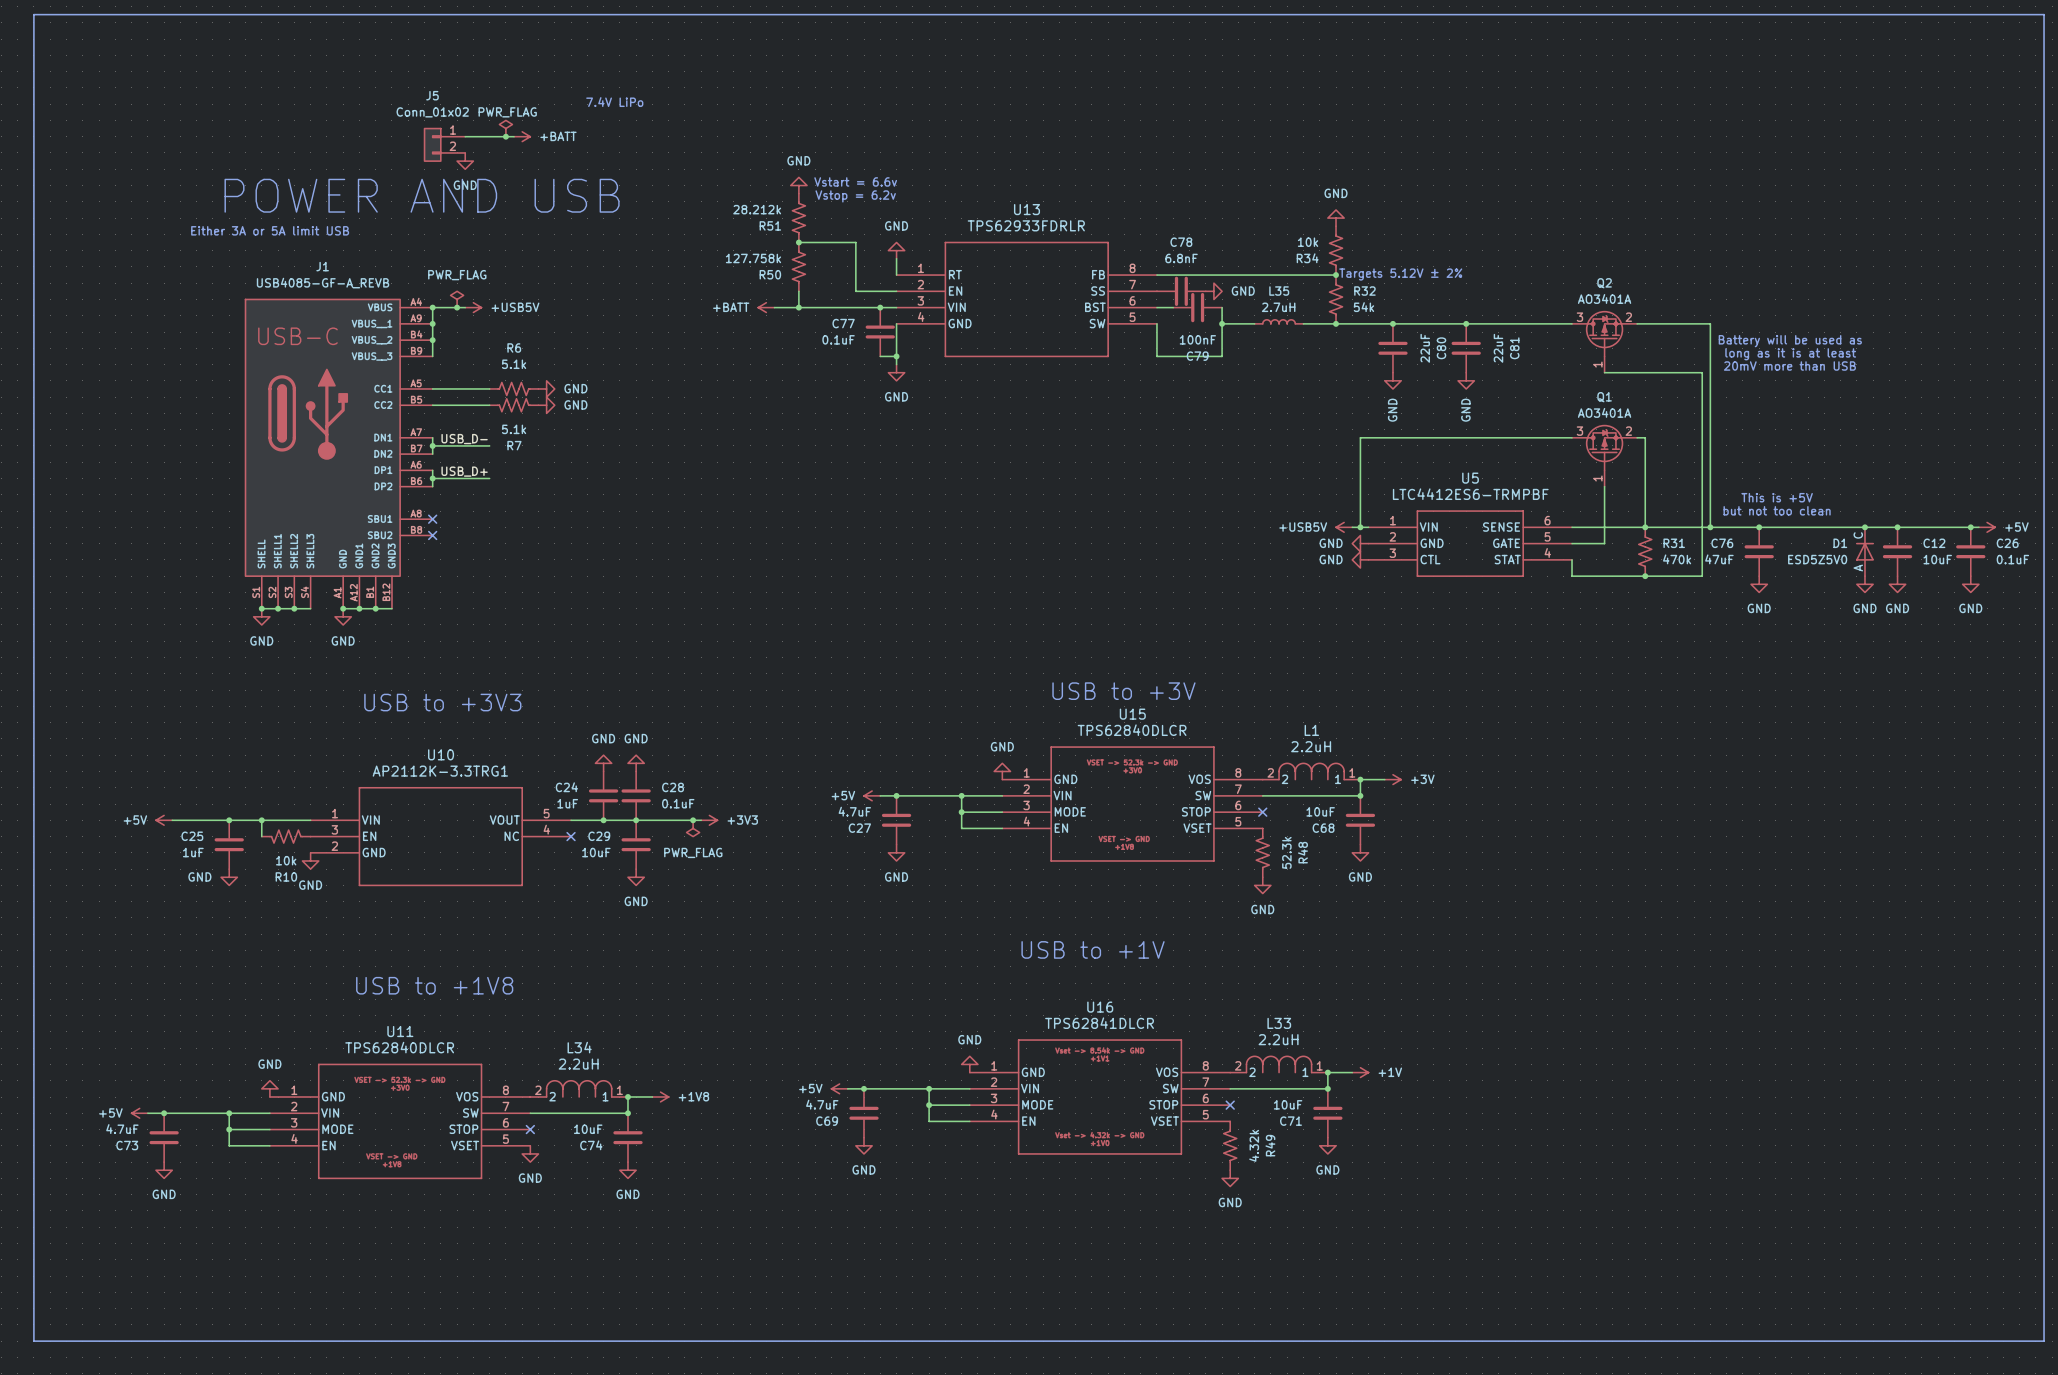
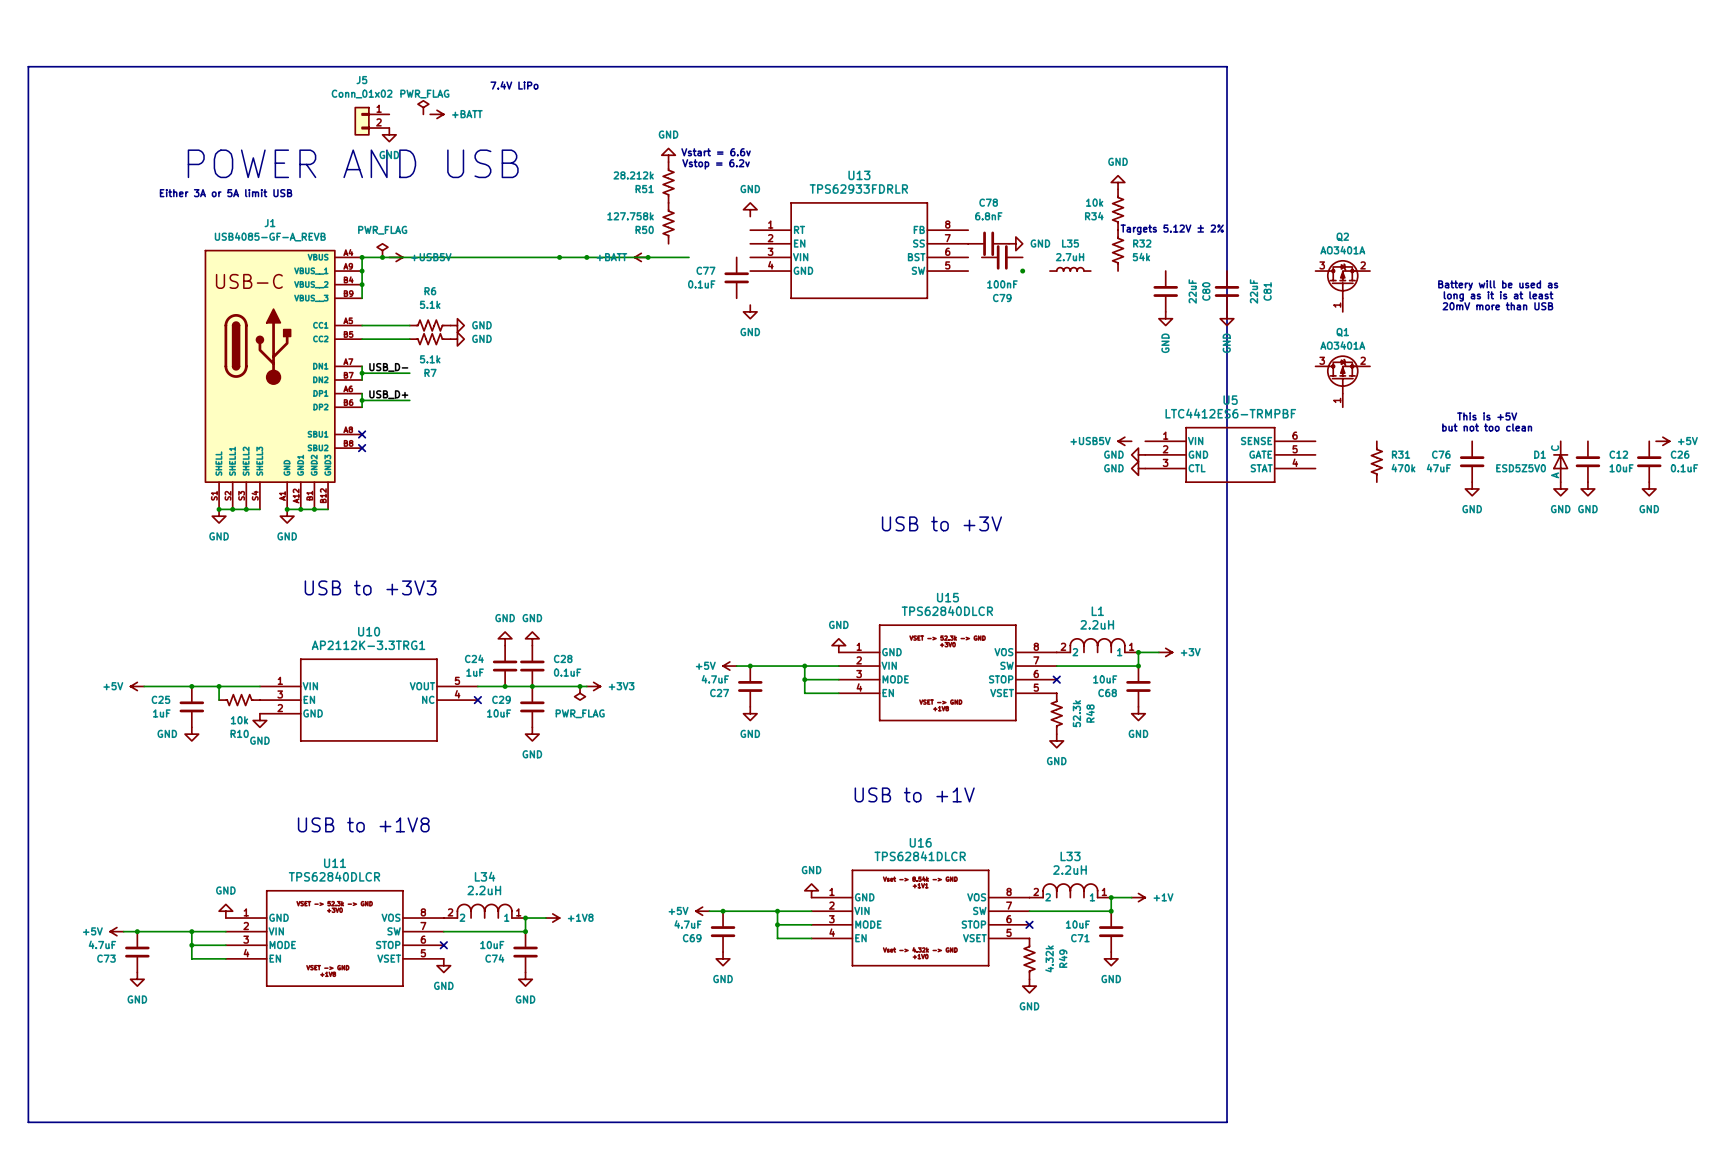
line: (33, 79) (33, 14) (2044, 14) (2044, 1341) (1466, 1341) -> (28, 66) (1227, 66) (1227, 1122)
wire: (465, 136) (514, 136) -> none
junction: (505, 136) -> none
wire: (798, 242) (855, 242) (855, 291) (896, 291) -> none
junction: (798, 242) -> none
wire: (896, 258) (896, 275) -> none
wire: (1156, 275) (1336, 275) -> none
junction: (1336, 275) -> none
wire: (798, 291) (798, 307) -> none
wire: none -> (389, 257) (648, 257)
junction: none -> (559, 257)
junction: none -> (586, 257)
junction position: (798, 307) -> (648, 257)
wire: (823, 307) (896, 307) -> none
junction: (880, 307) -> none
wire: (1156, 307) (1173, 307) -> none
wire: (1222, 307) (1222, 356) (1156, 356) (1156, 323) -> none
wire: (896, 323) (896, 364) -> none
wire: (1222, 323) (1254, 323) -> none
wire: (1303, 323) (1572, 323) -> none
junction: (1336, 323) -> none
junction: (1392, 323) -> none
junction: (1466, 323) -> none
wire: (1637, 323) (1710, 323) (1710, 527) -> none
wire: (880, 356) (896, 356) -> none
junction: (896, 356) -> none
wire: (1604, 372) (1702, 372) (1702, 576) (1572, 576) (1572, 559) -> none
wire: (1572, 437) (1360, 437) (1360, 527) -> none
wire: (1637, 437) (1645, 437) (1645, 527) -> none
wire: (1604, 486) (1604, 543) (1572, 543) -> none
wire: (1352, 527) (1368, 527) -> none
junction: (1360, 527) -> none
wire: (1572, 527) (1978, 527) -> none
junction: (1645, 527) -> none
junction: (1710, 527) -> none
junction: (1759, 527) -> none
junction: (1864, 527) -> none
junction: (1897, 527) -> none
junction: (1970, 527) -> none
junction: (1645, 576) -> none
text position: USB to +3V (1123, 691) -> USB to +3V (941, 523)

